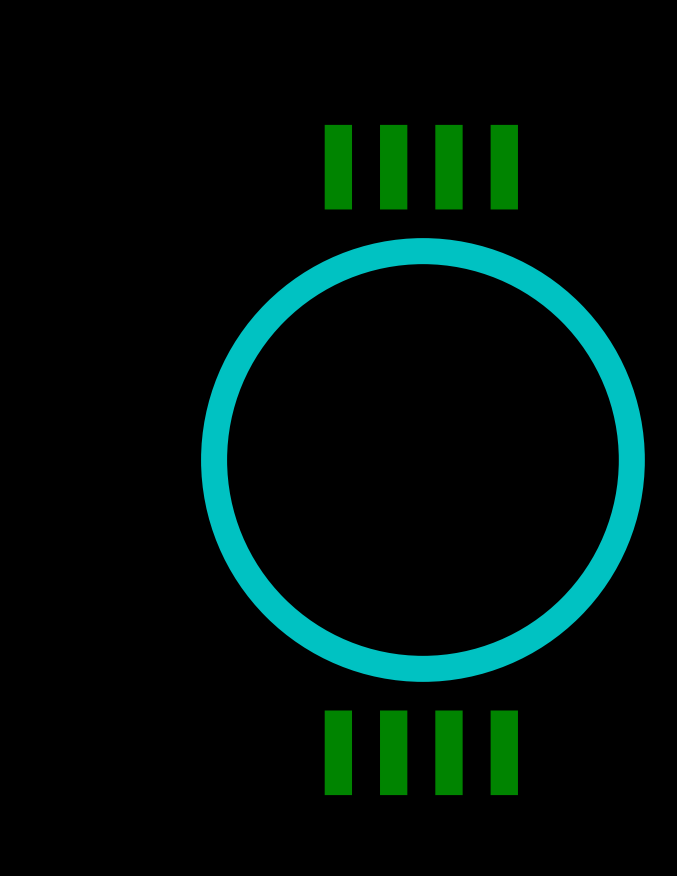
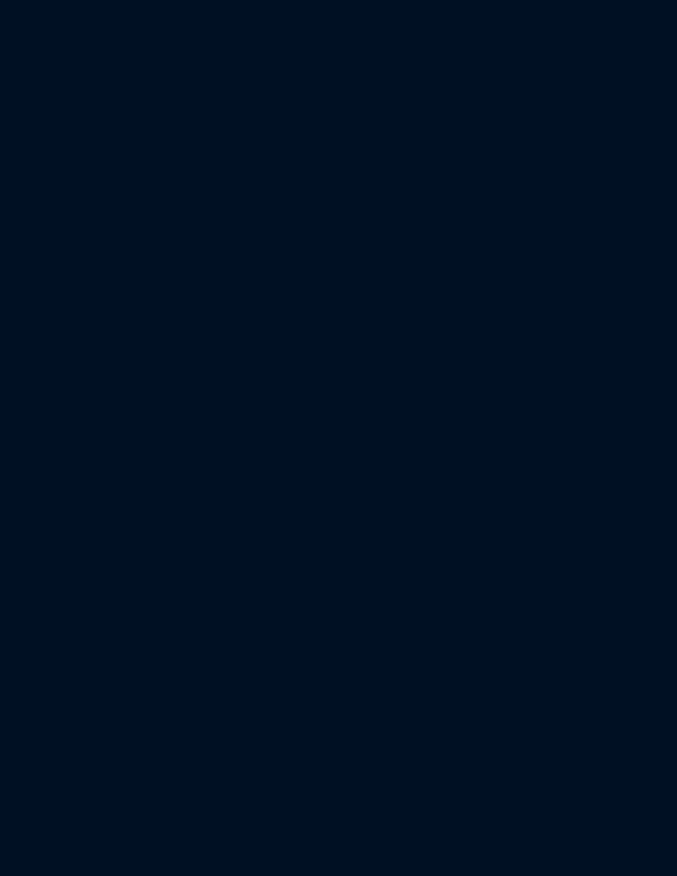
part: (422, 459) -> none

